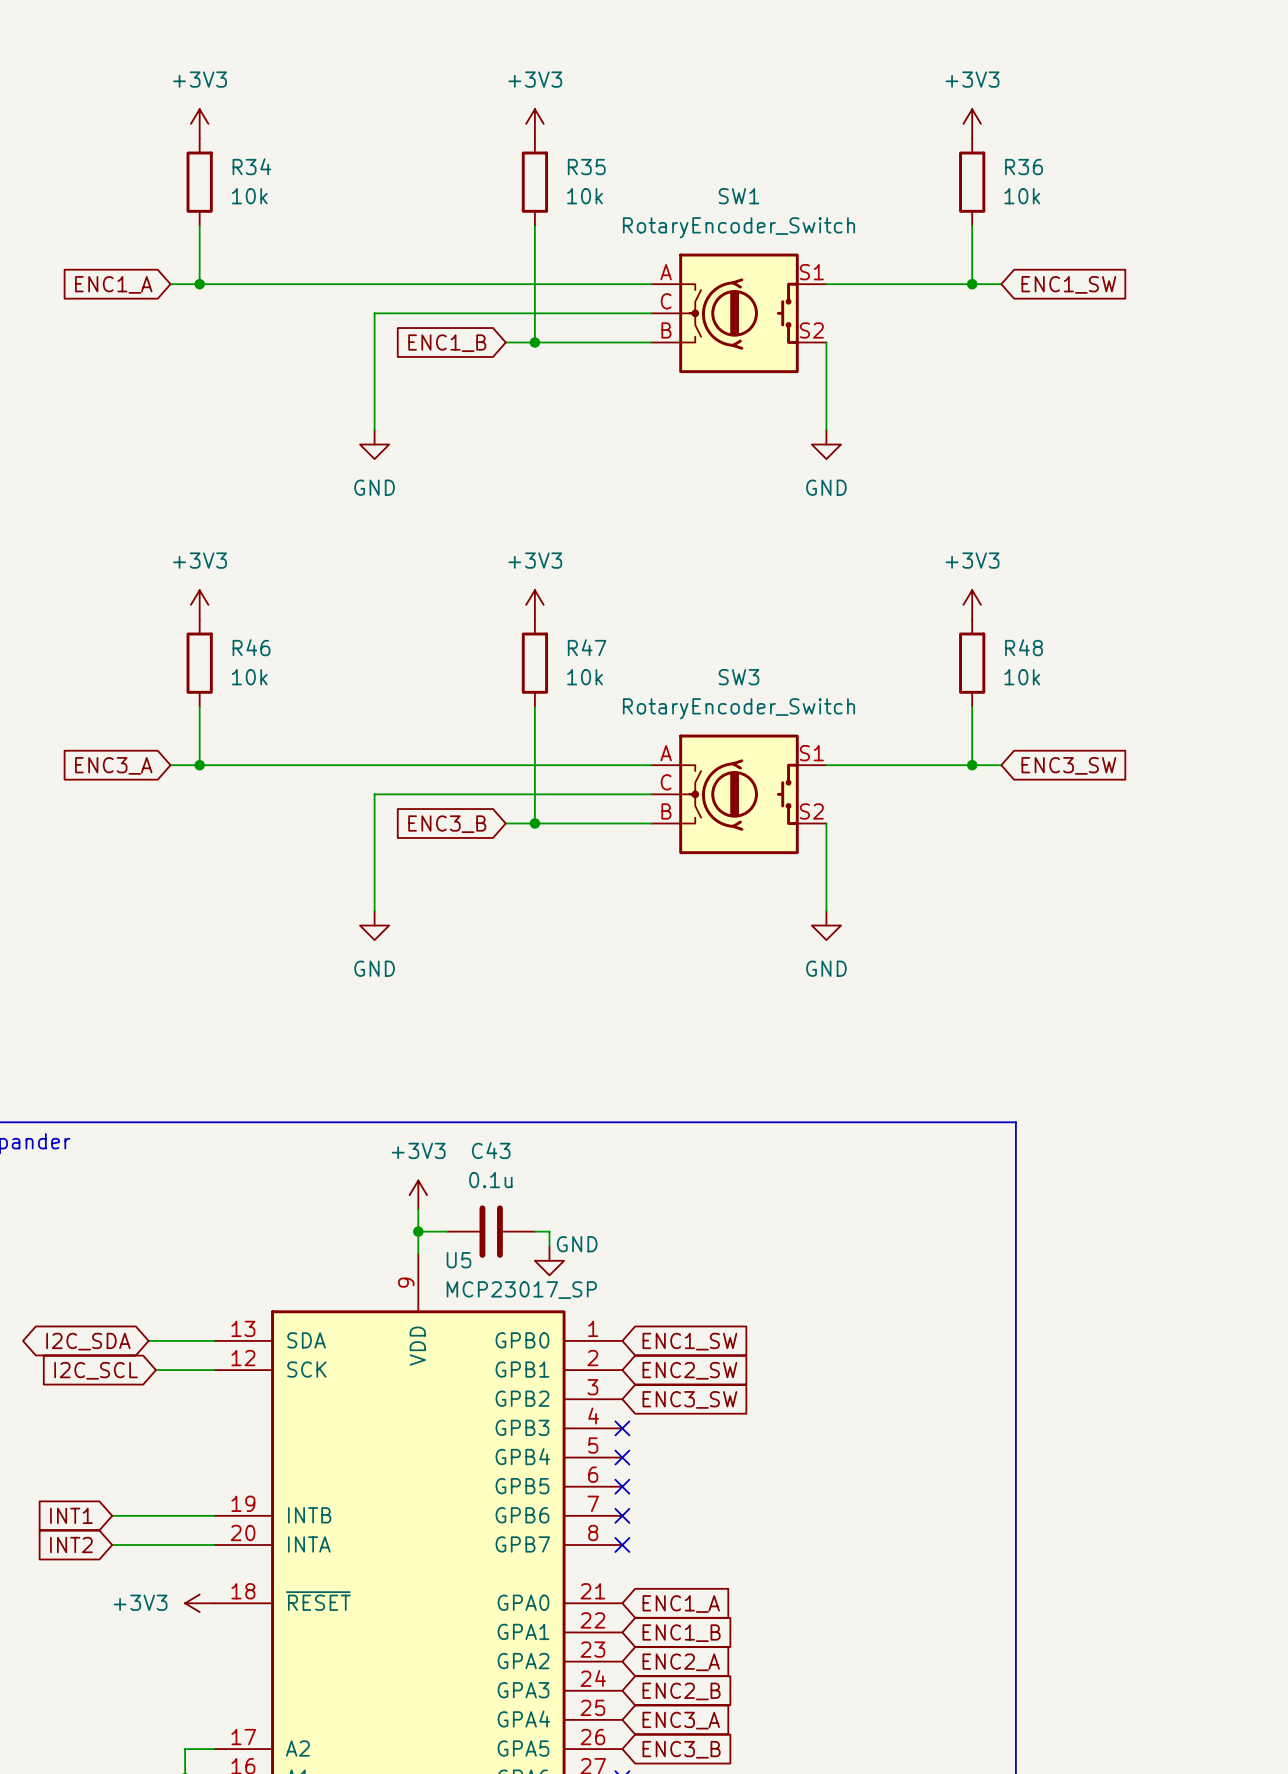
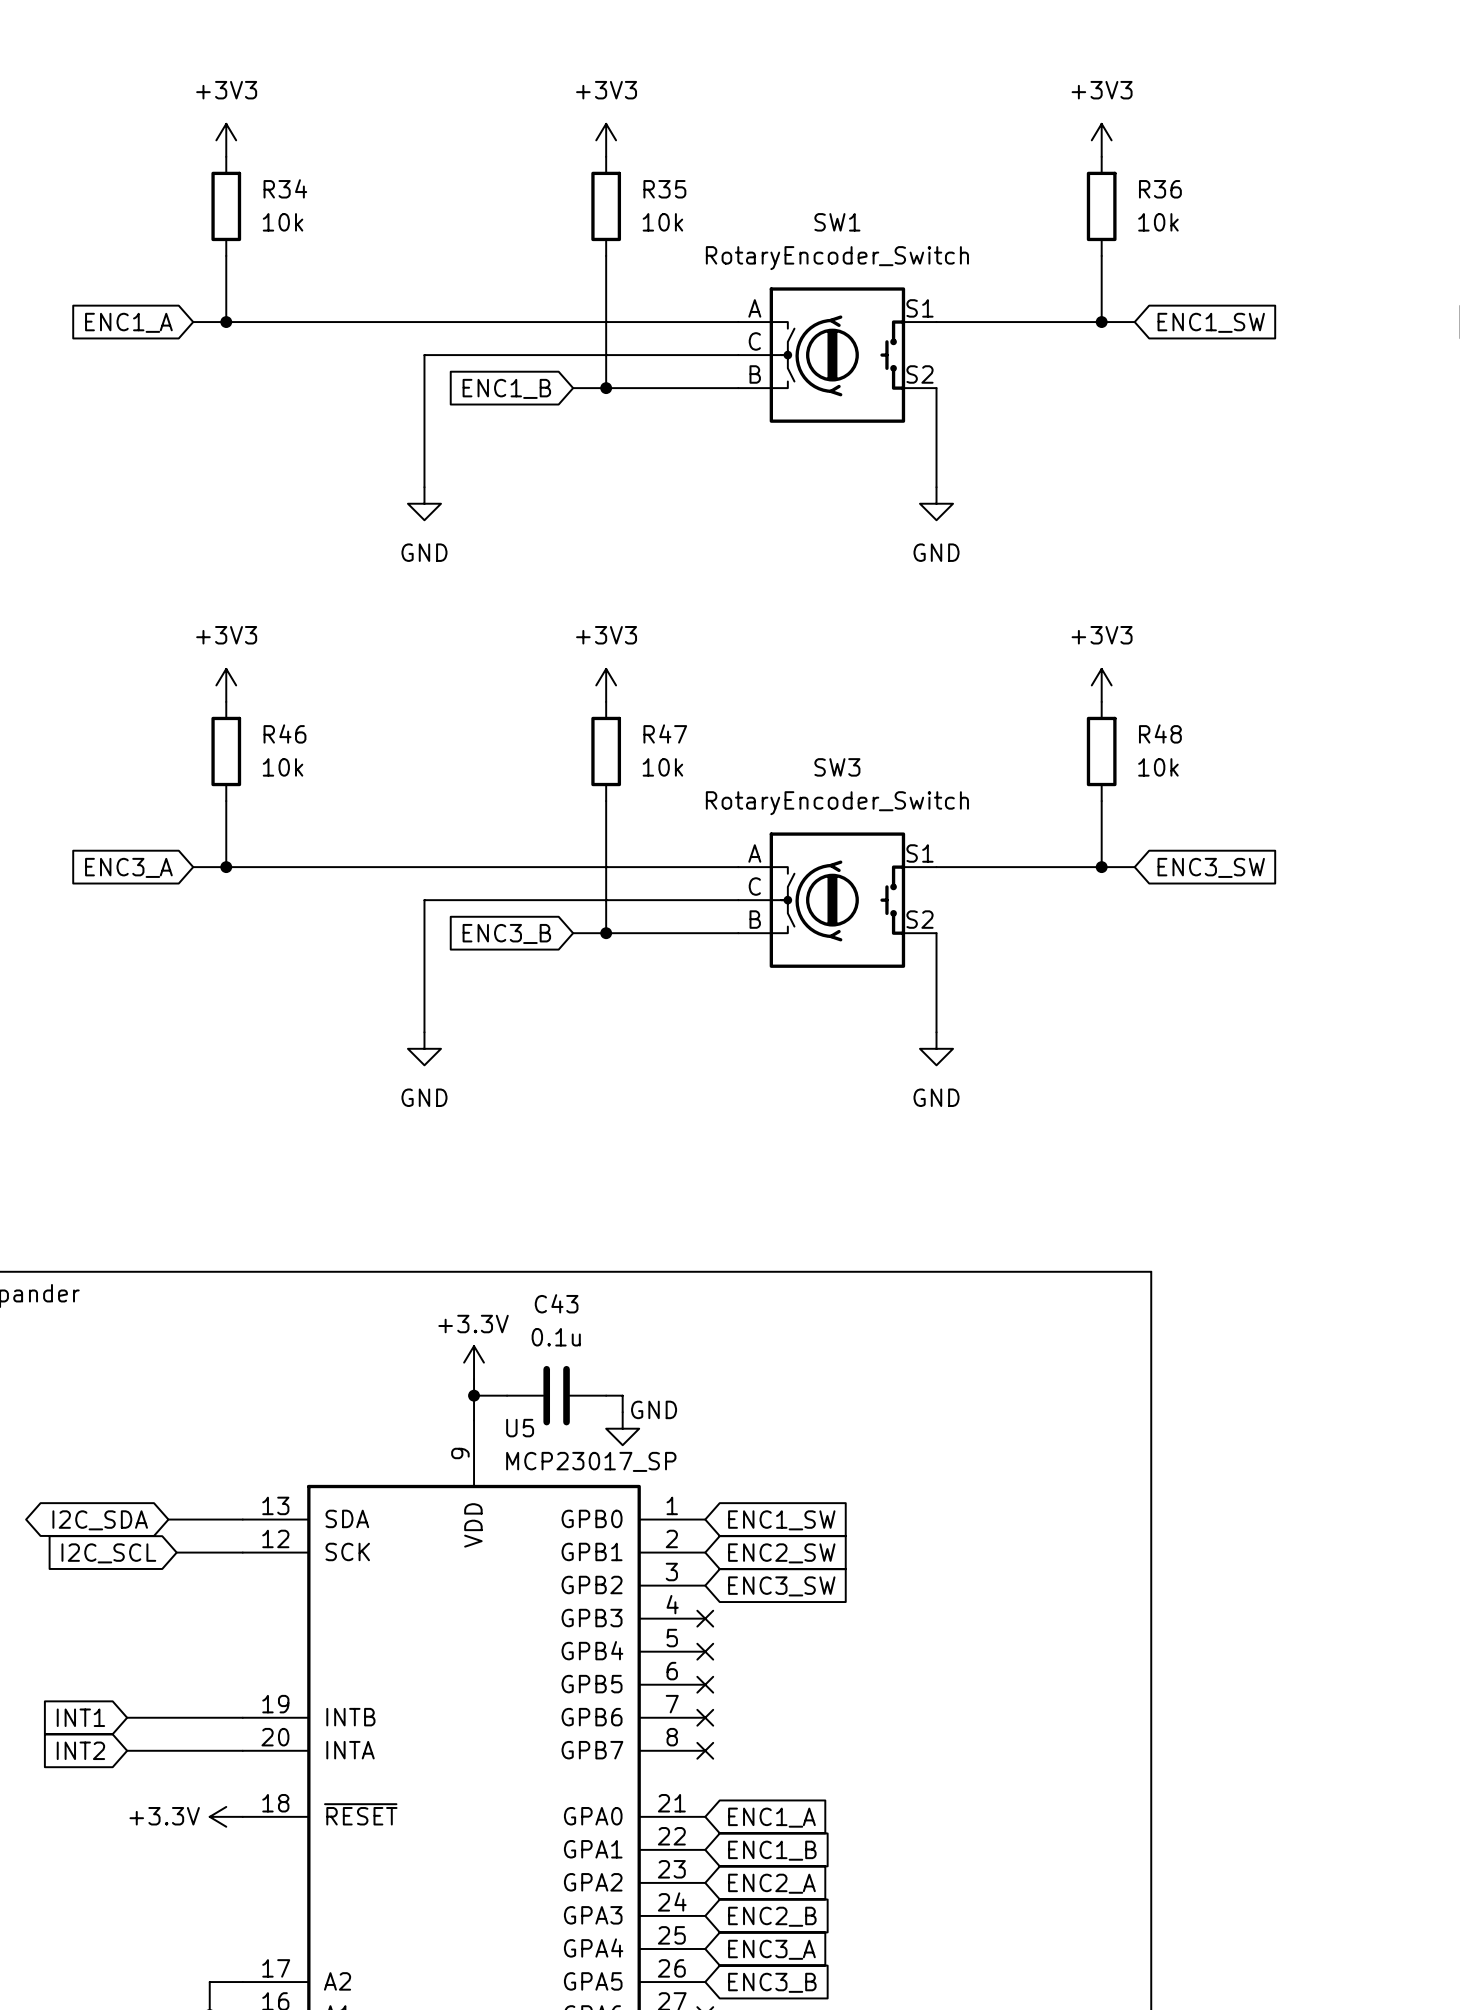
power symbol: +3V3 (418, 1195) -> +3.3V (474, 1362)
power symbol: +3V3 (199, 1603) -> +3.3V (226, 1816)

